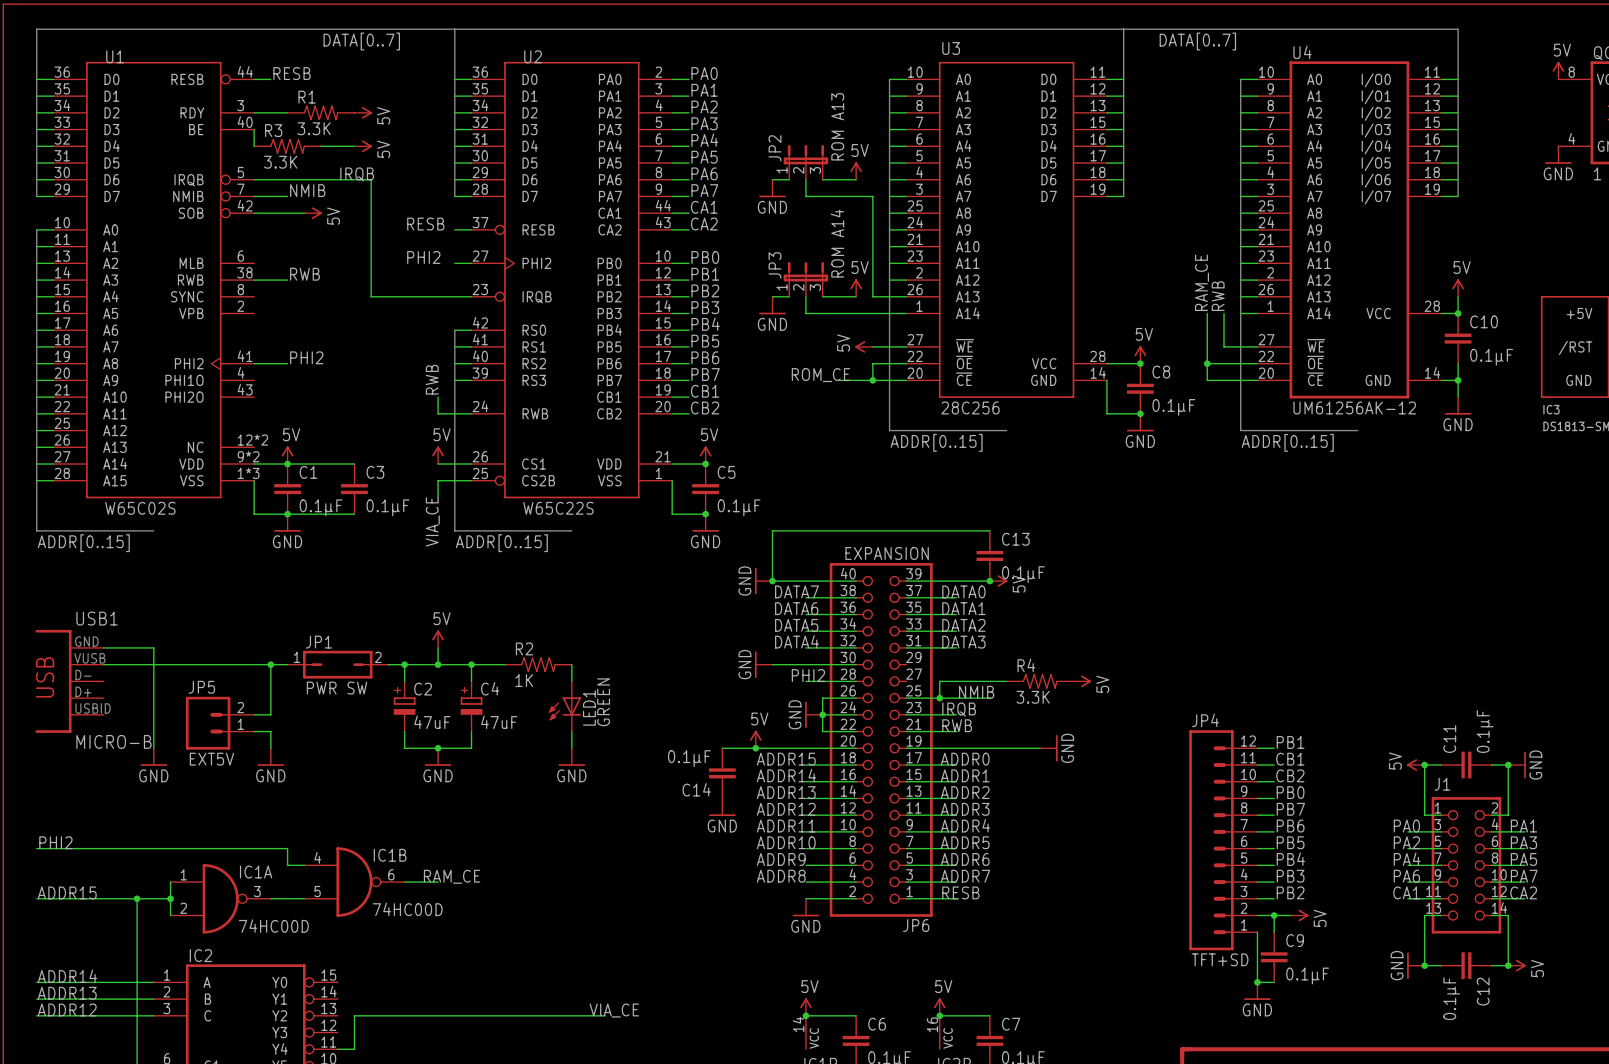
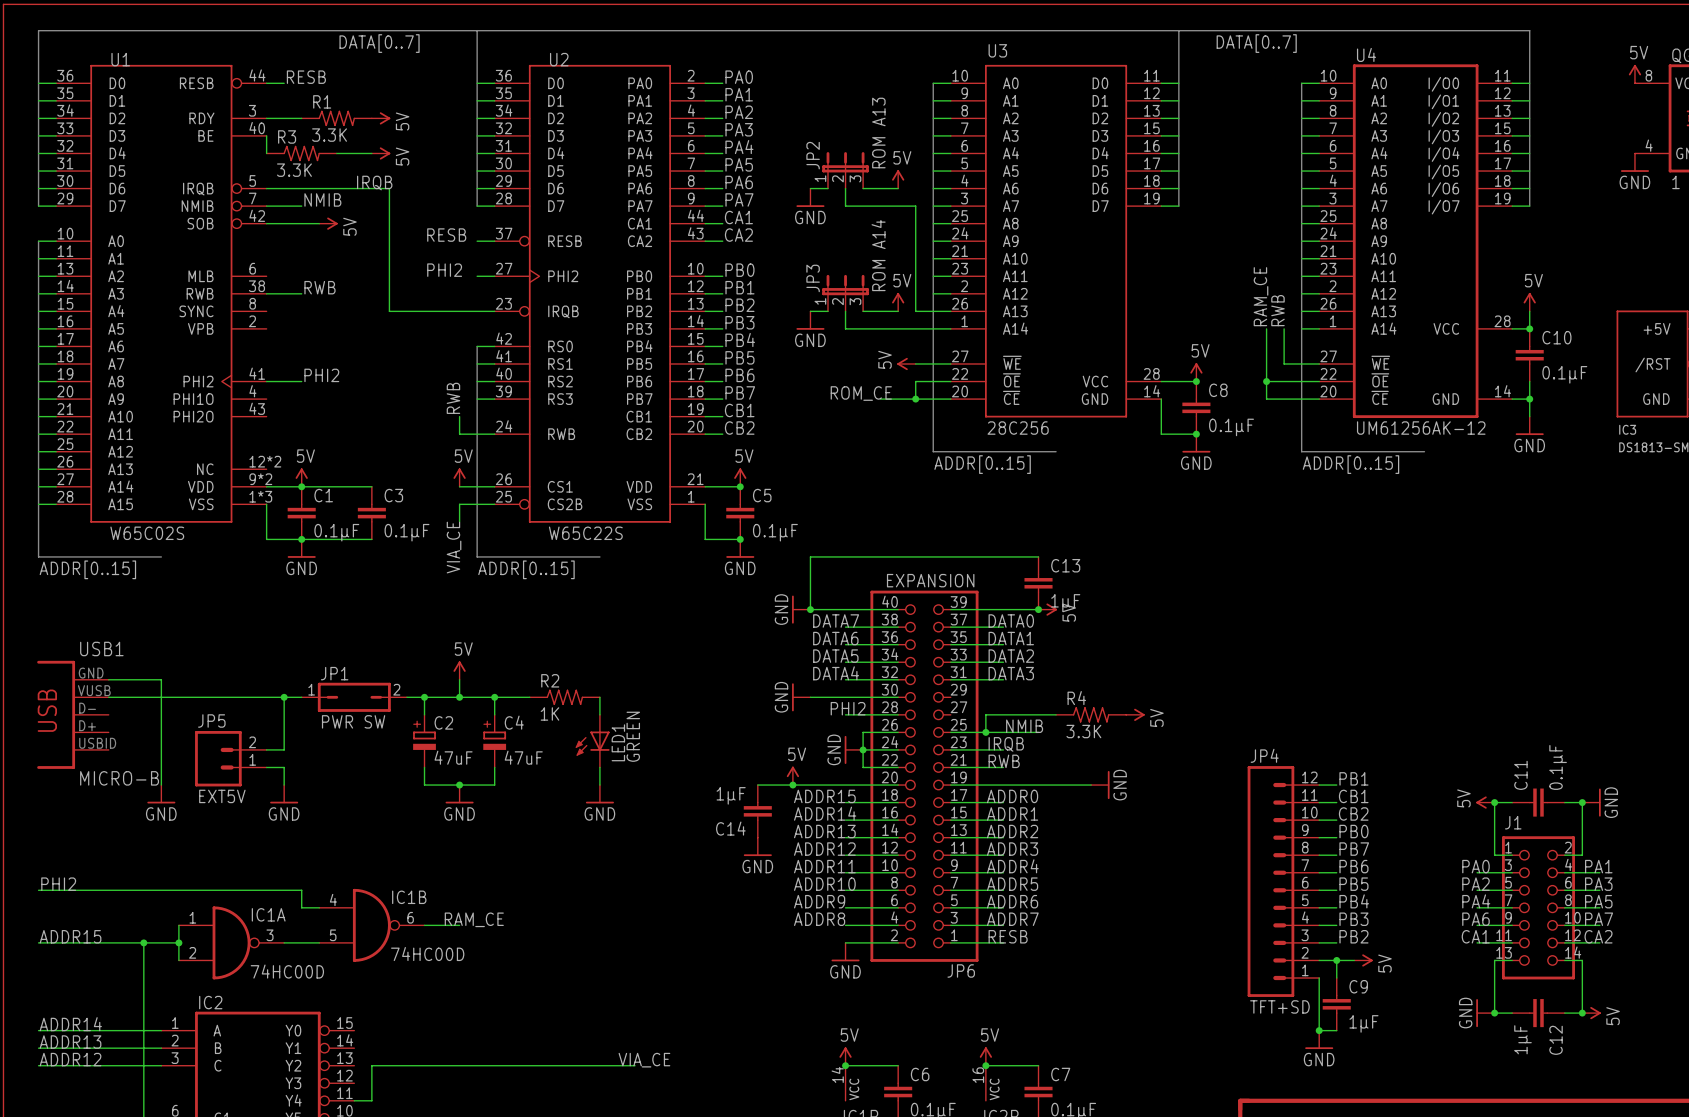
C13 value: 0.1μF (1023, 574) -> 1μF (1065, 602)
C14 value: 0.1μF (689, 758) -> 1μF (731, 795)
C9 value: 0.1μF (1307, 975) -> 1μF (1363, 1023)
C12 value: 0.1μF (1451, 998) -> 1μF (1522, 1039)

